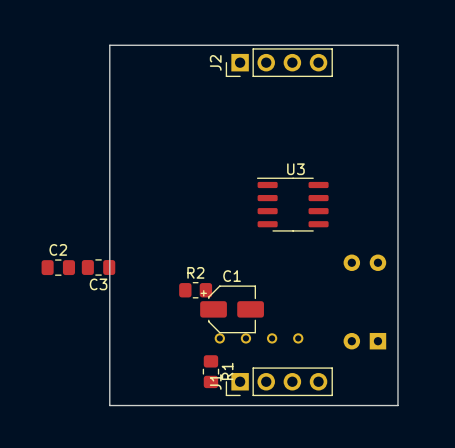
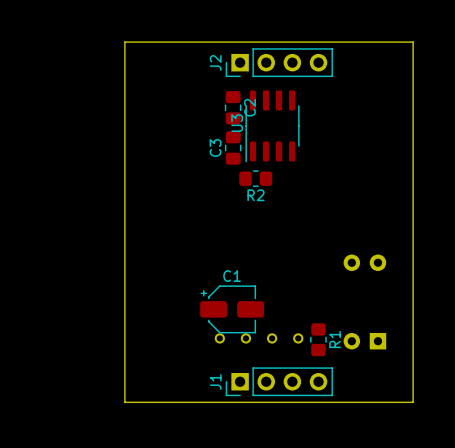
board edge: (109, 45) (397, 45) (397, 405) (109, 405) (109, 45) -> (124, 42) (413, 42) (413, 402) (124, 402) (124, 42)
U3 rotation: 0° (292, 204) -> 90° counterclockwise (272, 126)
U3 position: (292, 204) -> (272, 126)
C2 rotation: 0° (58, 267) -> 90° clockwise (233, 107)
C2 position: (58, 267) -> (233, 107)
C3 rotation: 0° (98, 267) -> 90° clockwise (233, 147)
C3 position: (98, 267) -> (233, 147)
R2 name position: R2 (195, 272) -> R2 (255, 195)
R2 position: (195, 290) -> (255, 178)
R1 position: (210, 371) -> (318, 339)

